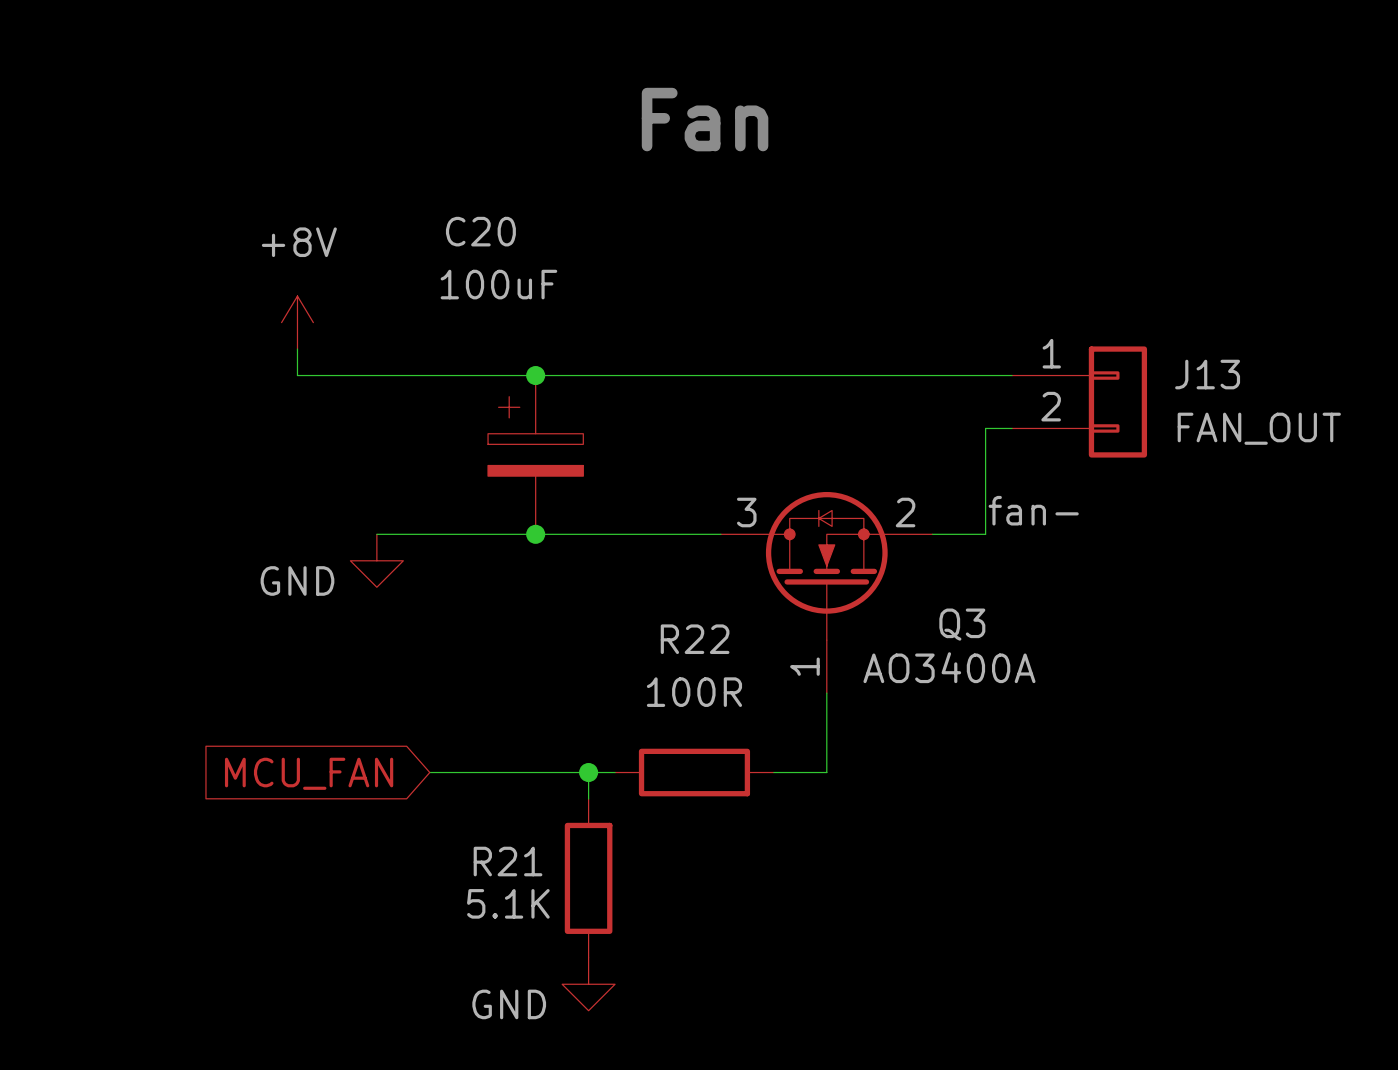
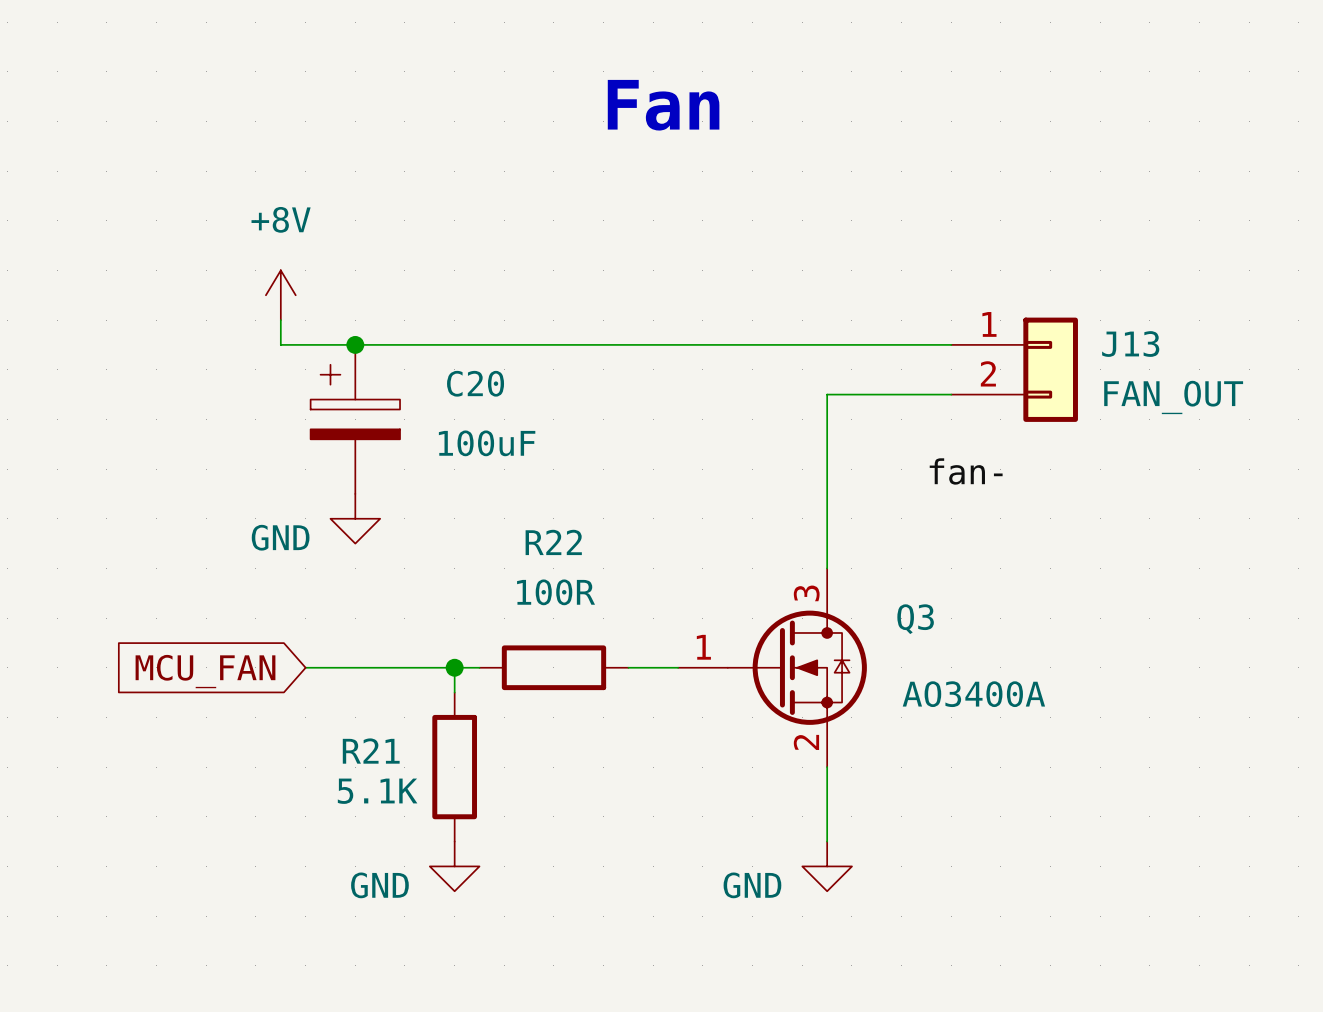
C20 name position: C20 (480, 231) -> C20 (475, 383)
C20 value position: 100uF (498, 284) -> 100uF (487, 443)
junction: none -> (355, 344)
junction: (535, 375) -> none
wire: (985, 428) (985, 534) (932, 534) -> (926, 394) (827, 394) (827, 568)
C20 position: (535, 454) -> (355, 419)
wire: (376, 534) (720, 534) -> none
junction: (535, 534) -> none
Q3 rotation: 0° (826, 566) -> 90° clockwise (797, 667)
Q3 position: (826, 592) -> (772, 667)
Q3 name position: Q3 (962, 624) -> Q3 (915, 619)
Q3 value position: AO3400A (949, 667) -> AO3400A (973, 694)
wire: (826, 693) (826, 772) (773, 772) -> none
junction: none -> (454, 667)
wire: none -> (628, 667) (678, 667)
wire: (429, 772) (615, 772) -> (305, 667) (479, 667)
wire: (588, 772) (588, 798) -> (454, 667) (454, 692)
junction: (588, 772) -> none
R22 position: (694, 772) -> (553, 667)
global label position: MCU_FAN (309, 773) -> MCU_FAN (205, 671)
wire: none -> (827, 767) (827, 841)
R21 position: (588, 878) -> (454, 767)
power symbol: none -> GND (827, 866)
power symbol position: GND (588, 984) -> GND (454, 866)

